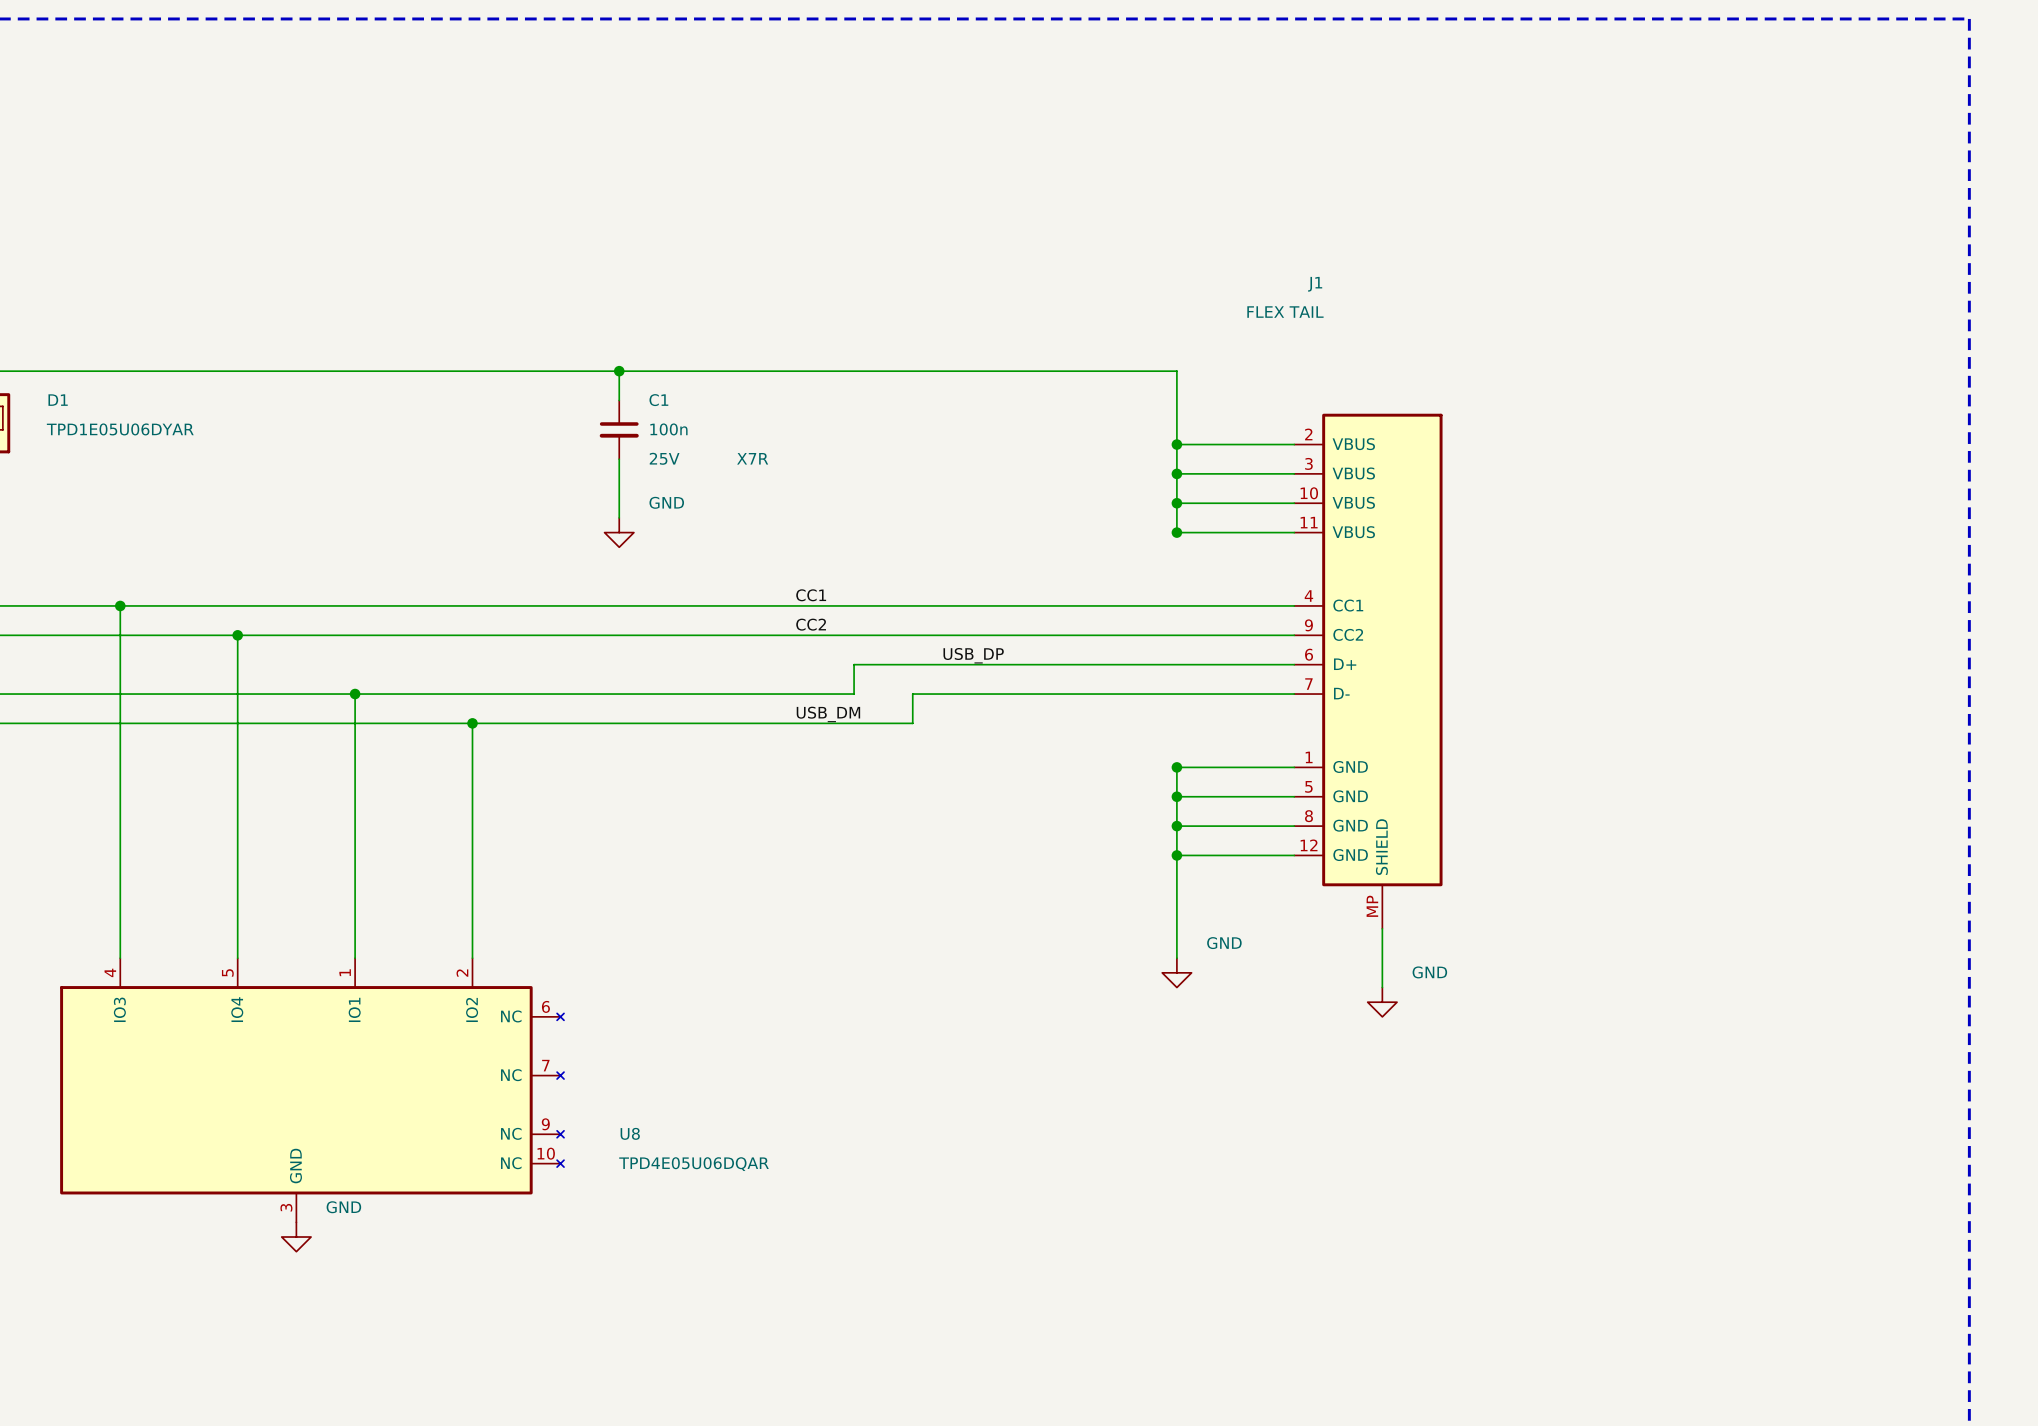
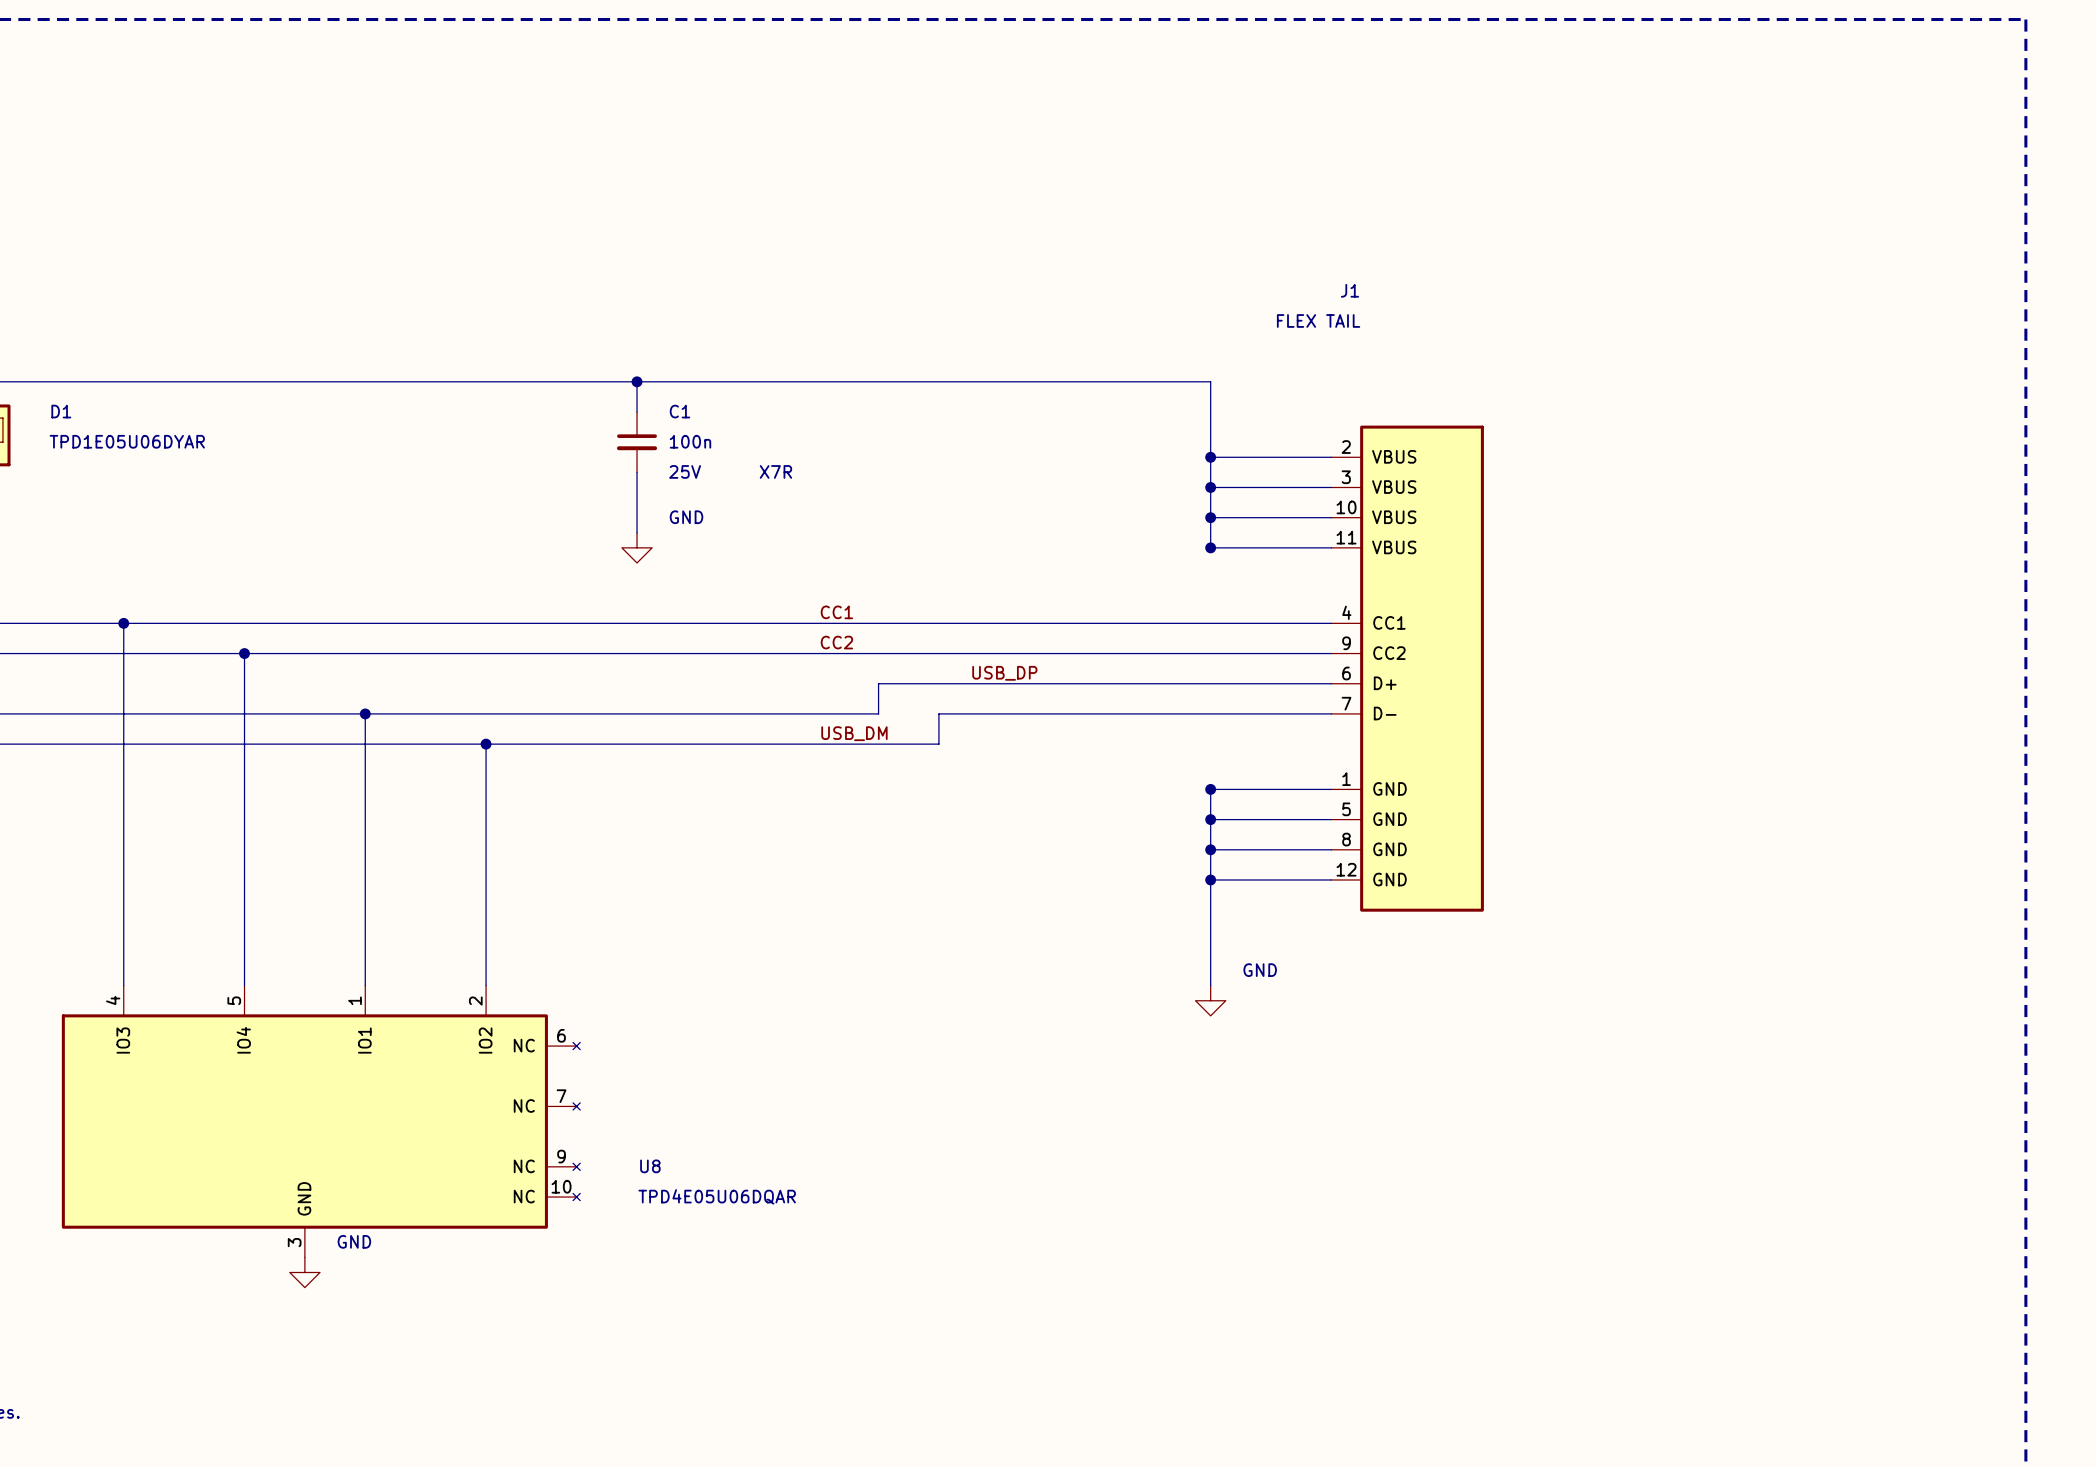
J1 symbol: [1294, 413, 1443, 929] -> [1331, 425, 1484, 912]
wire: (1382, 928) (1382, 987) -> none
power symbol: GND (1382, 1002) -> none

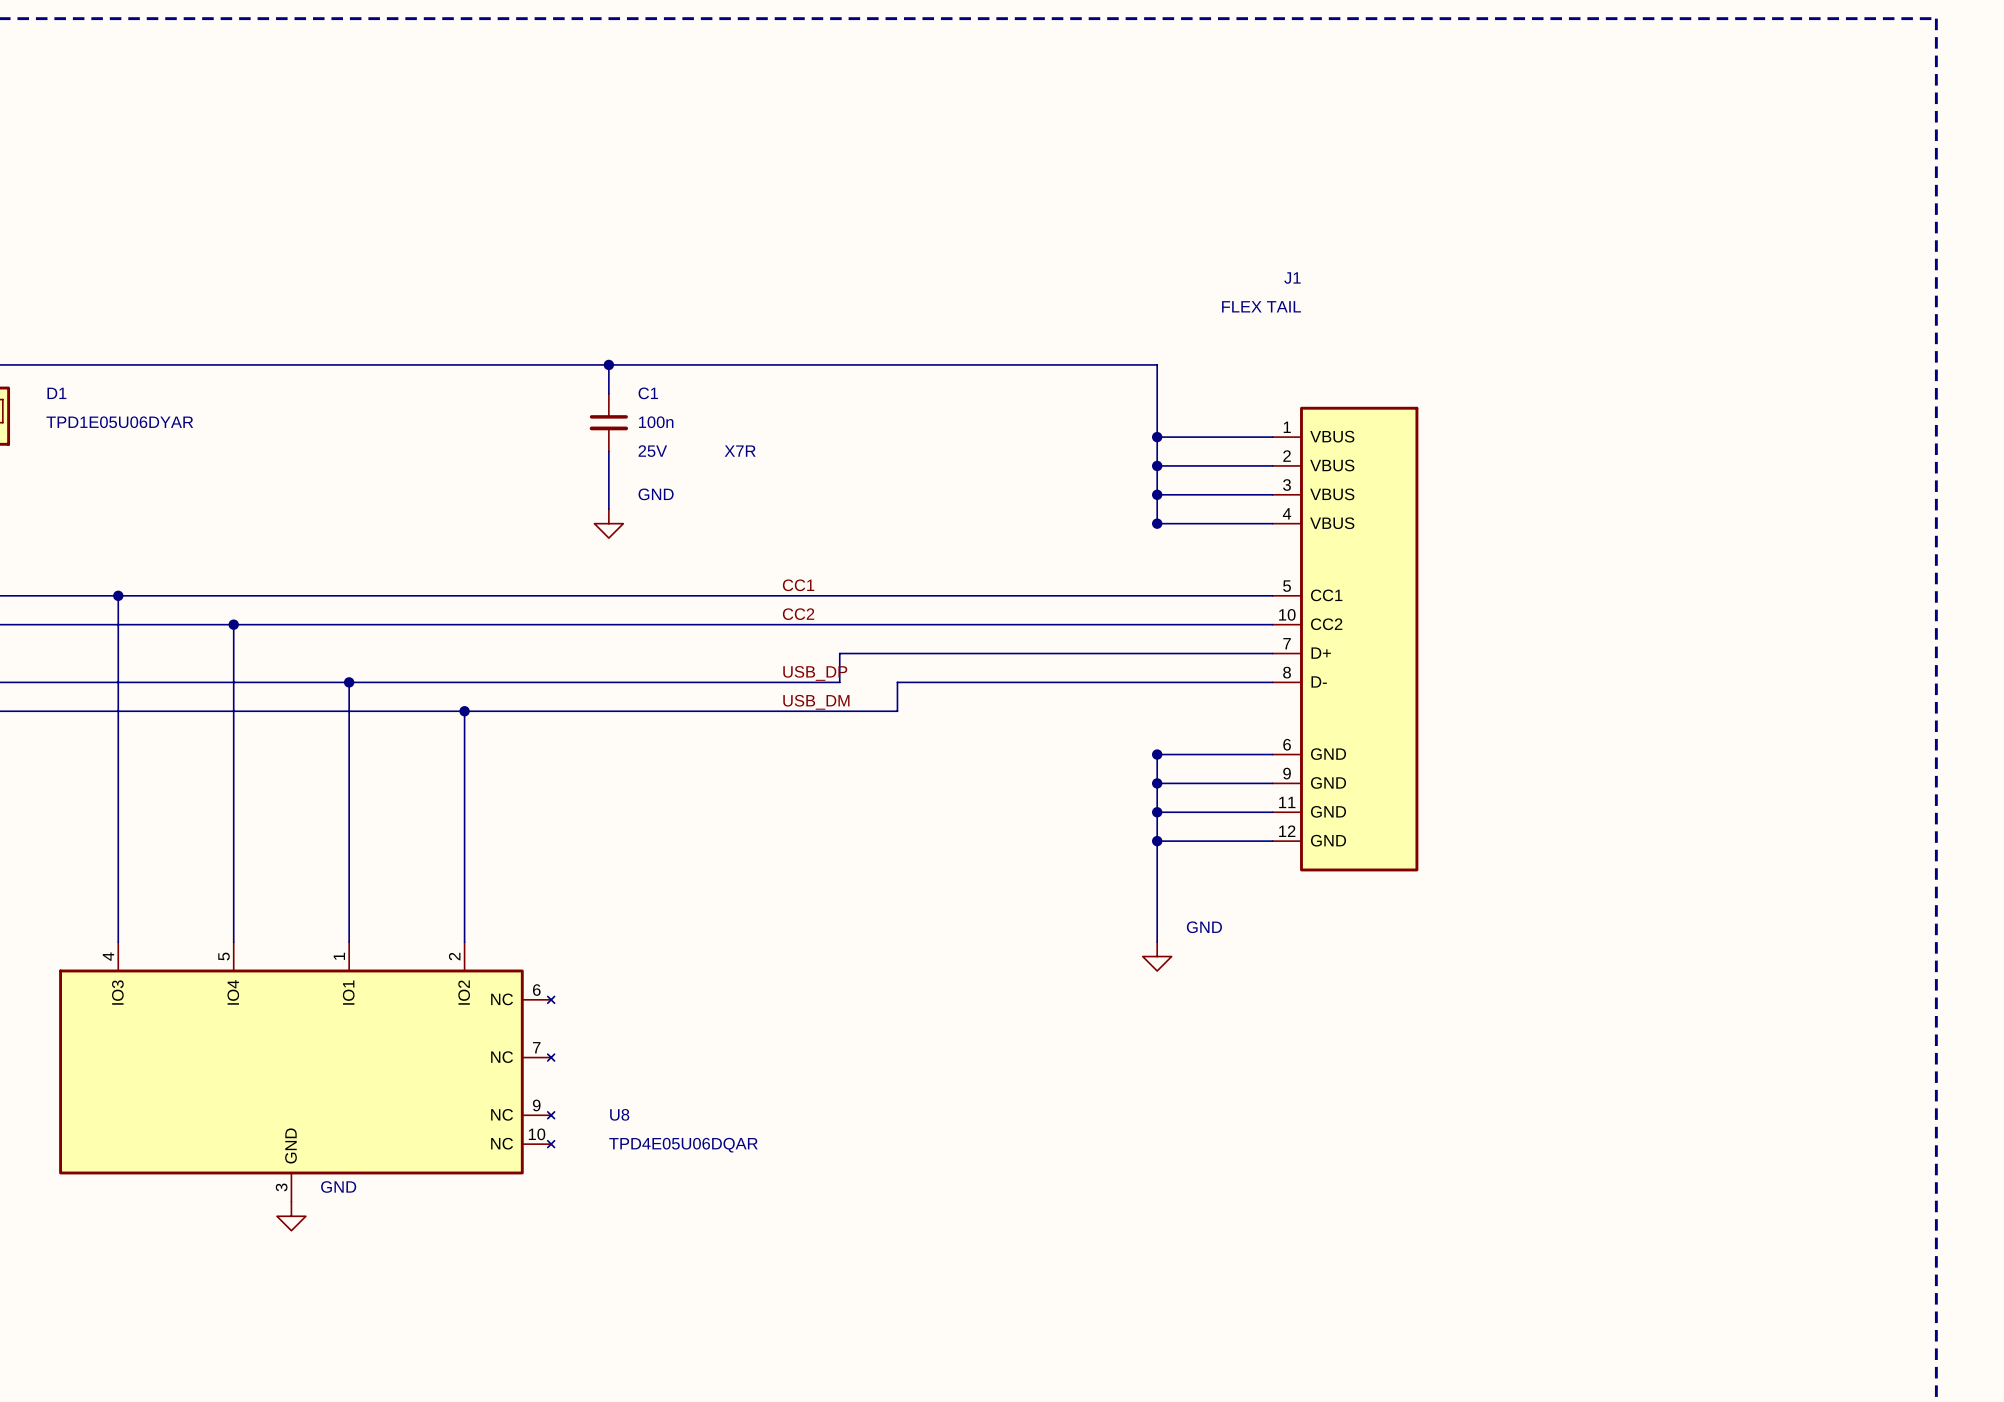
J1 symbol: [1331, 425, 1484, 912] -> [1272, 406, 1419, 872]
label position: USB_DP (1004, 673) -> USB_DP (815, 673)

